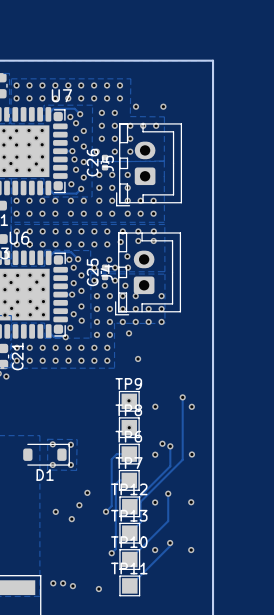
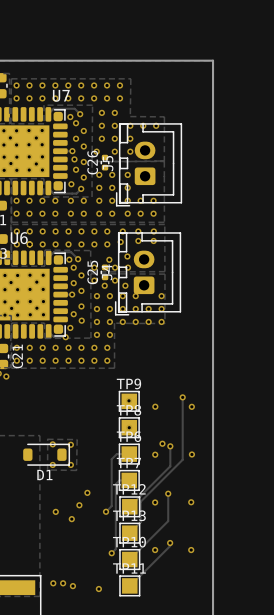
via: (136, 106) -> none
via: (163, 106) -> none
via: (129, 333) -> none
via: (138, 358) -> none

